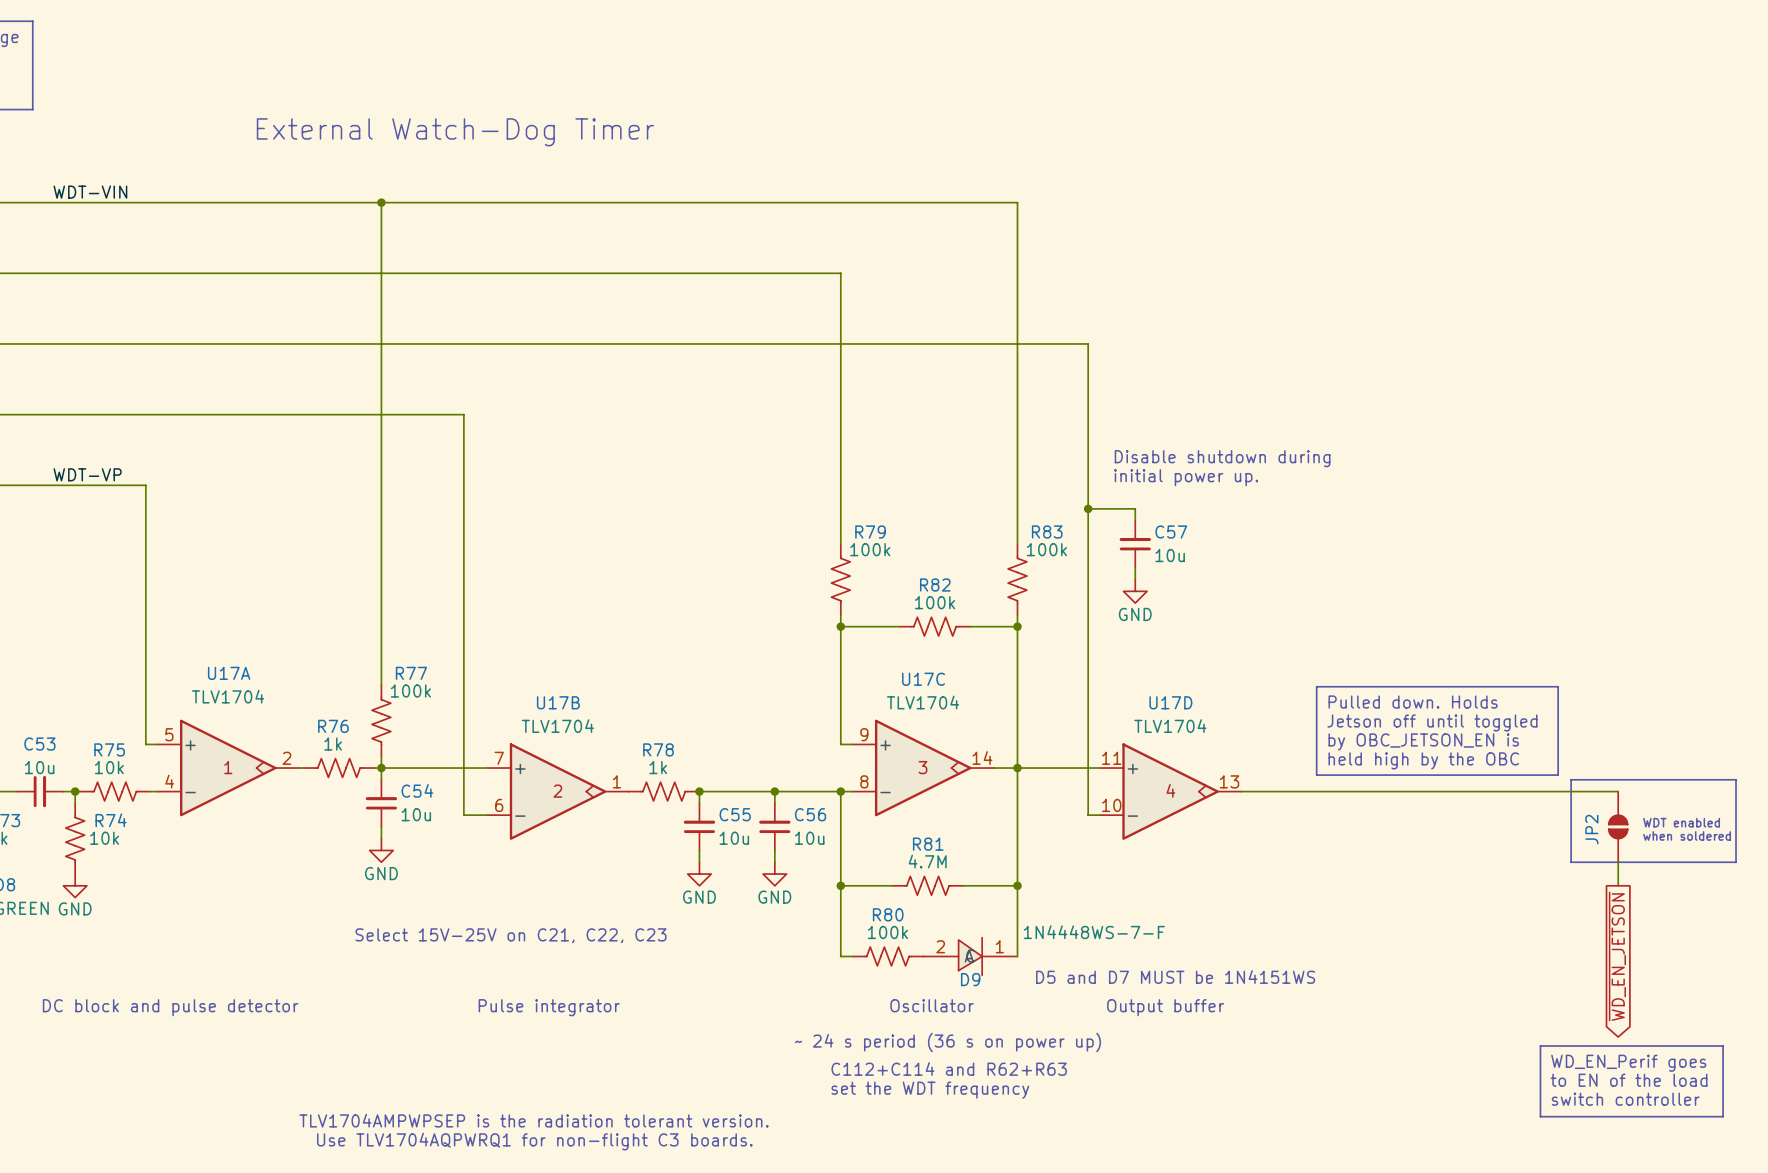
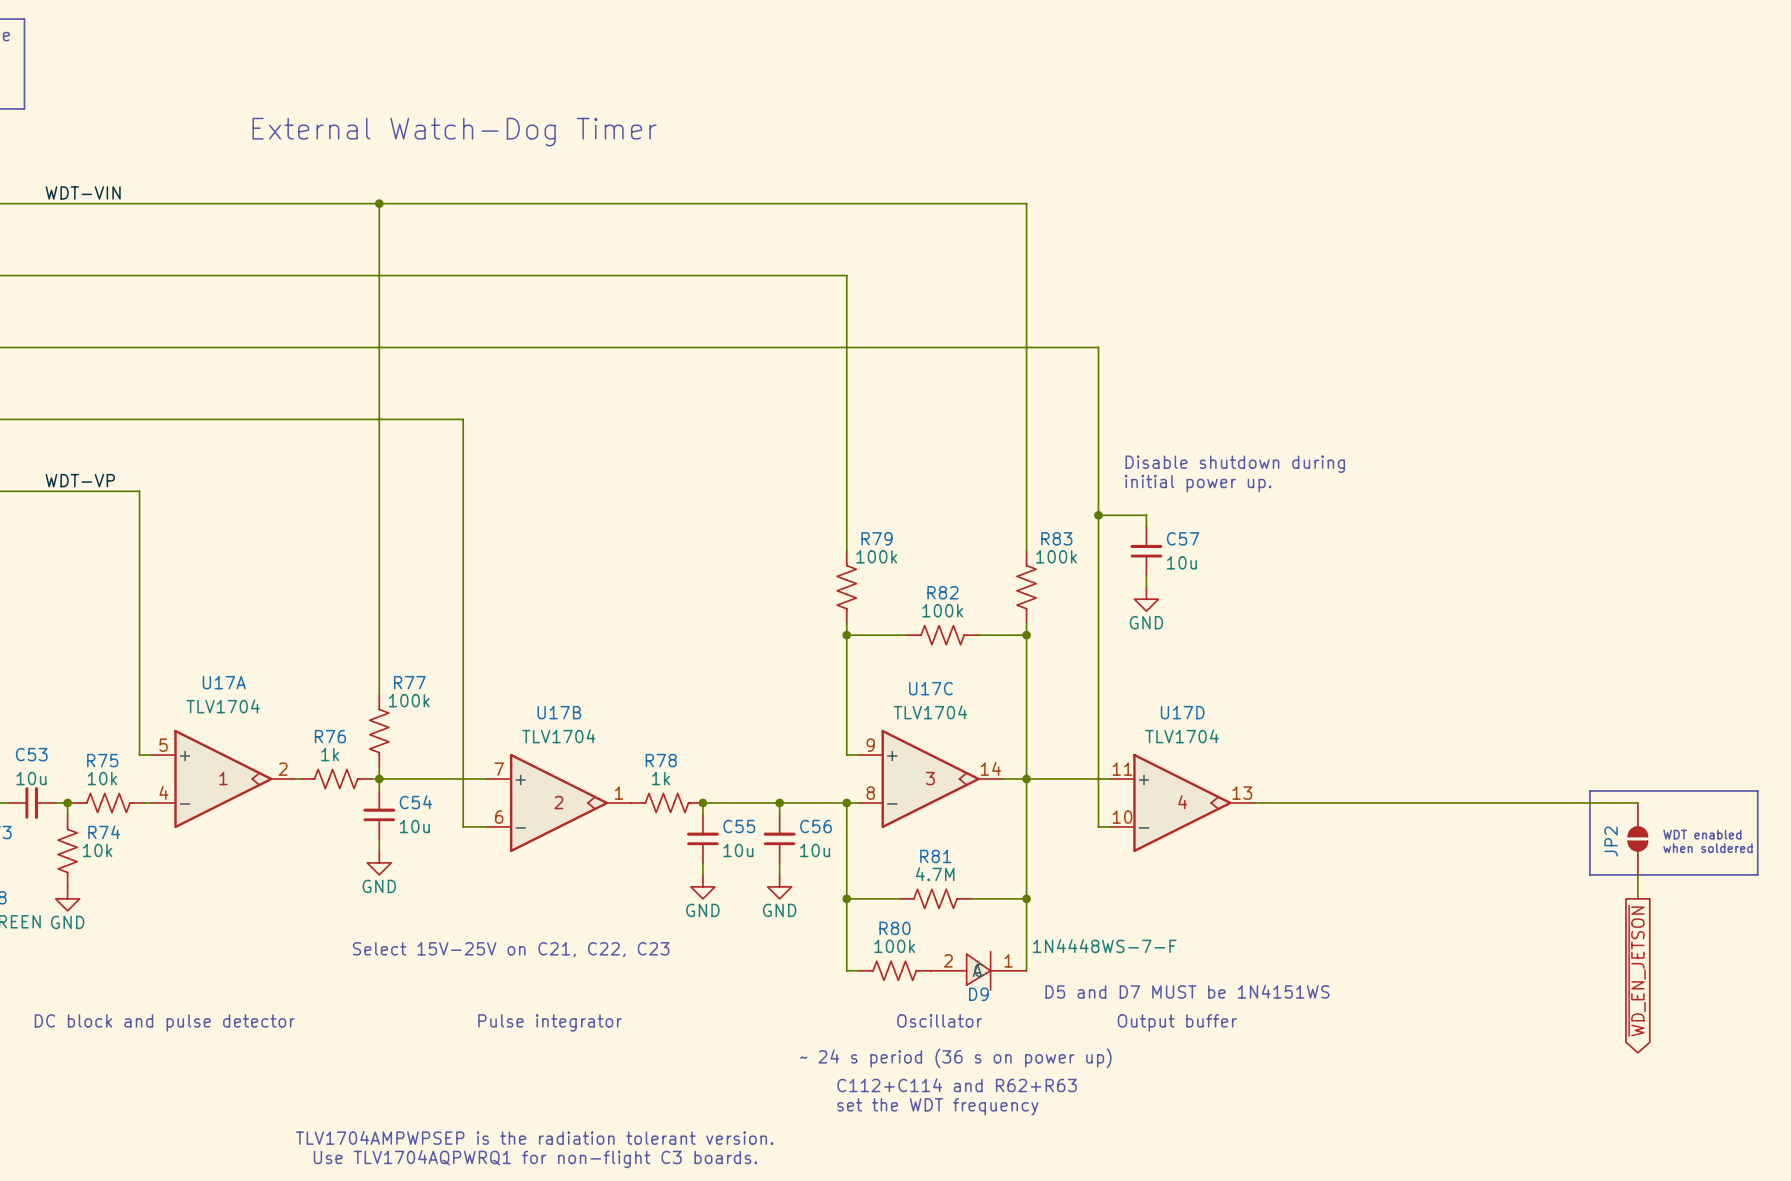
line: (1316, 686) (1558, 686) (1558, 775) (1316, 775) (1316, 686) -> none
text: Pulled down. Holds (1413, 702) -> none
text: Jetson off until toggled (1432, 722) -> none
text: by OBC_JETSON_EN is (1423, 741) -> none
text: held high by the OBC (1423, 760) -> none
line: (1540, 1046) (1723, 1046) (1723, 1116) (1540, 1116) (1540, 1046) -> none
text: WD_EN_Perif goes (1628, 1063) -> none
text: to EN of the load (1629, 1080) -> none
text: switch controller (1625, 1099) -> none

